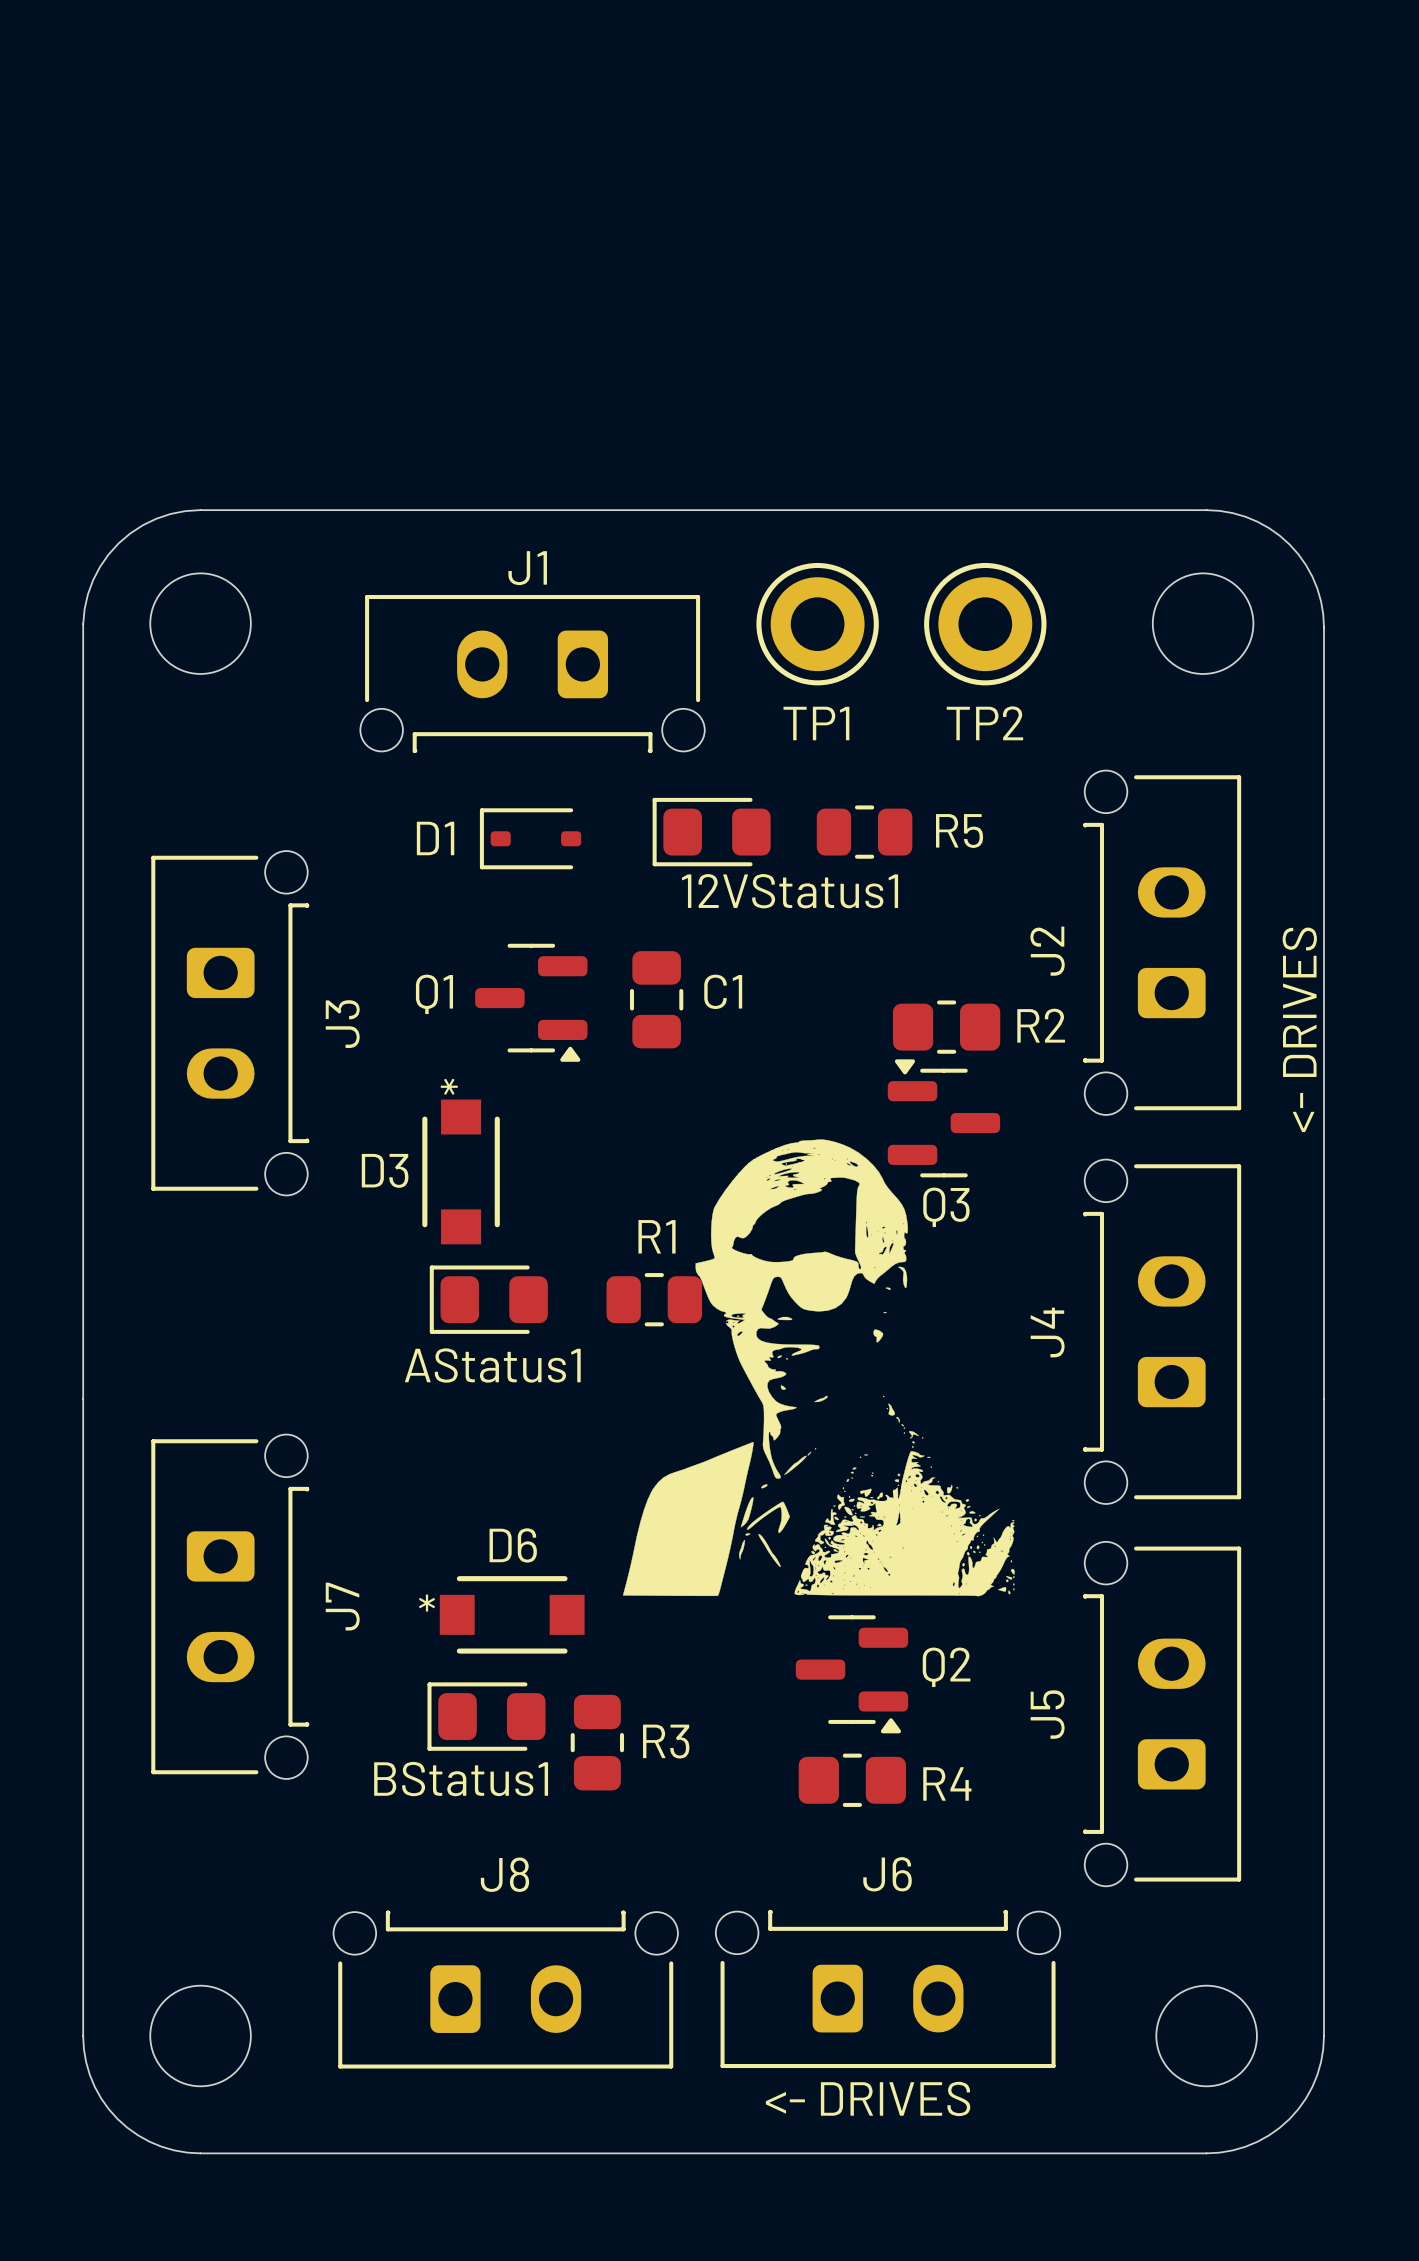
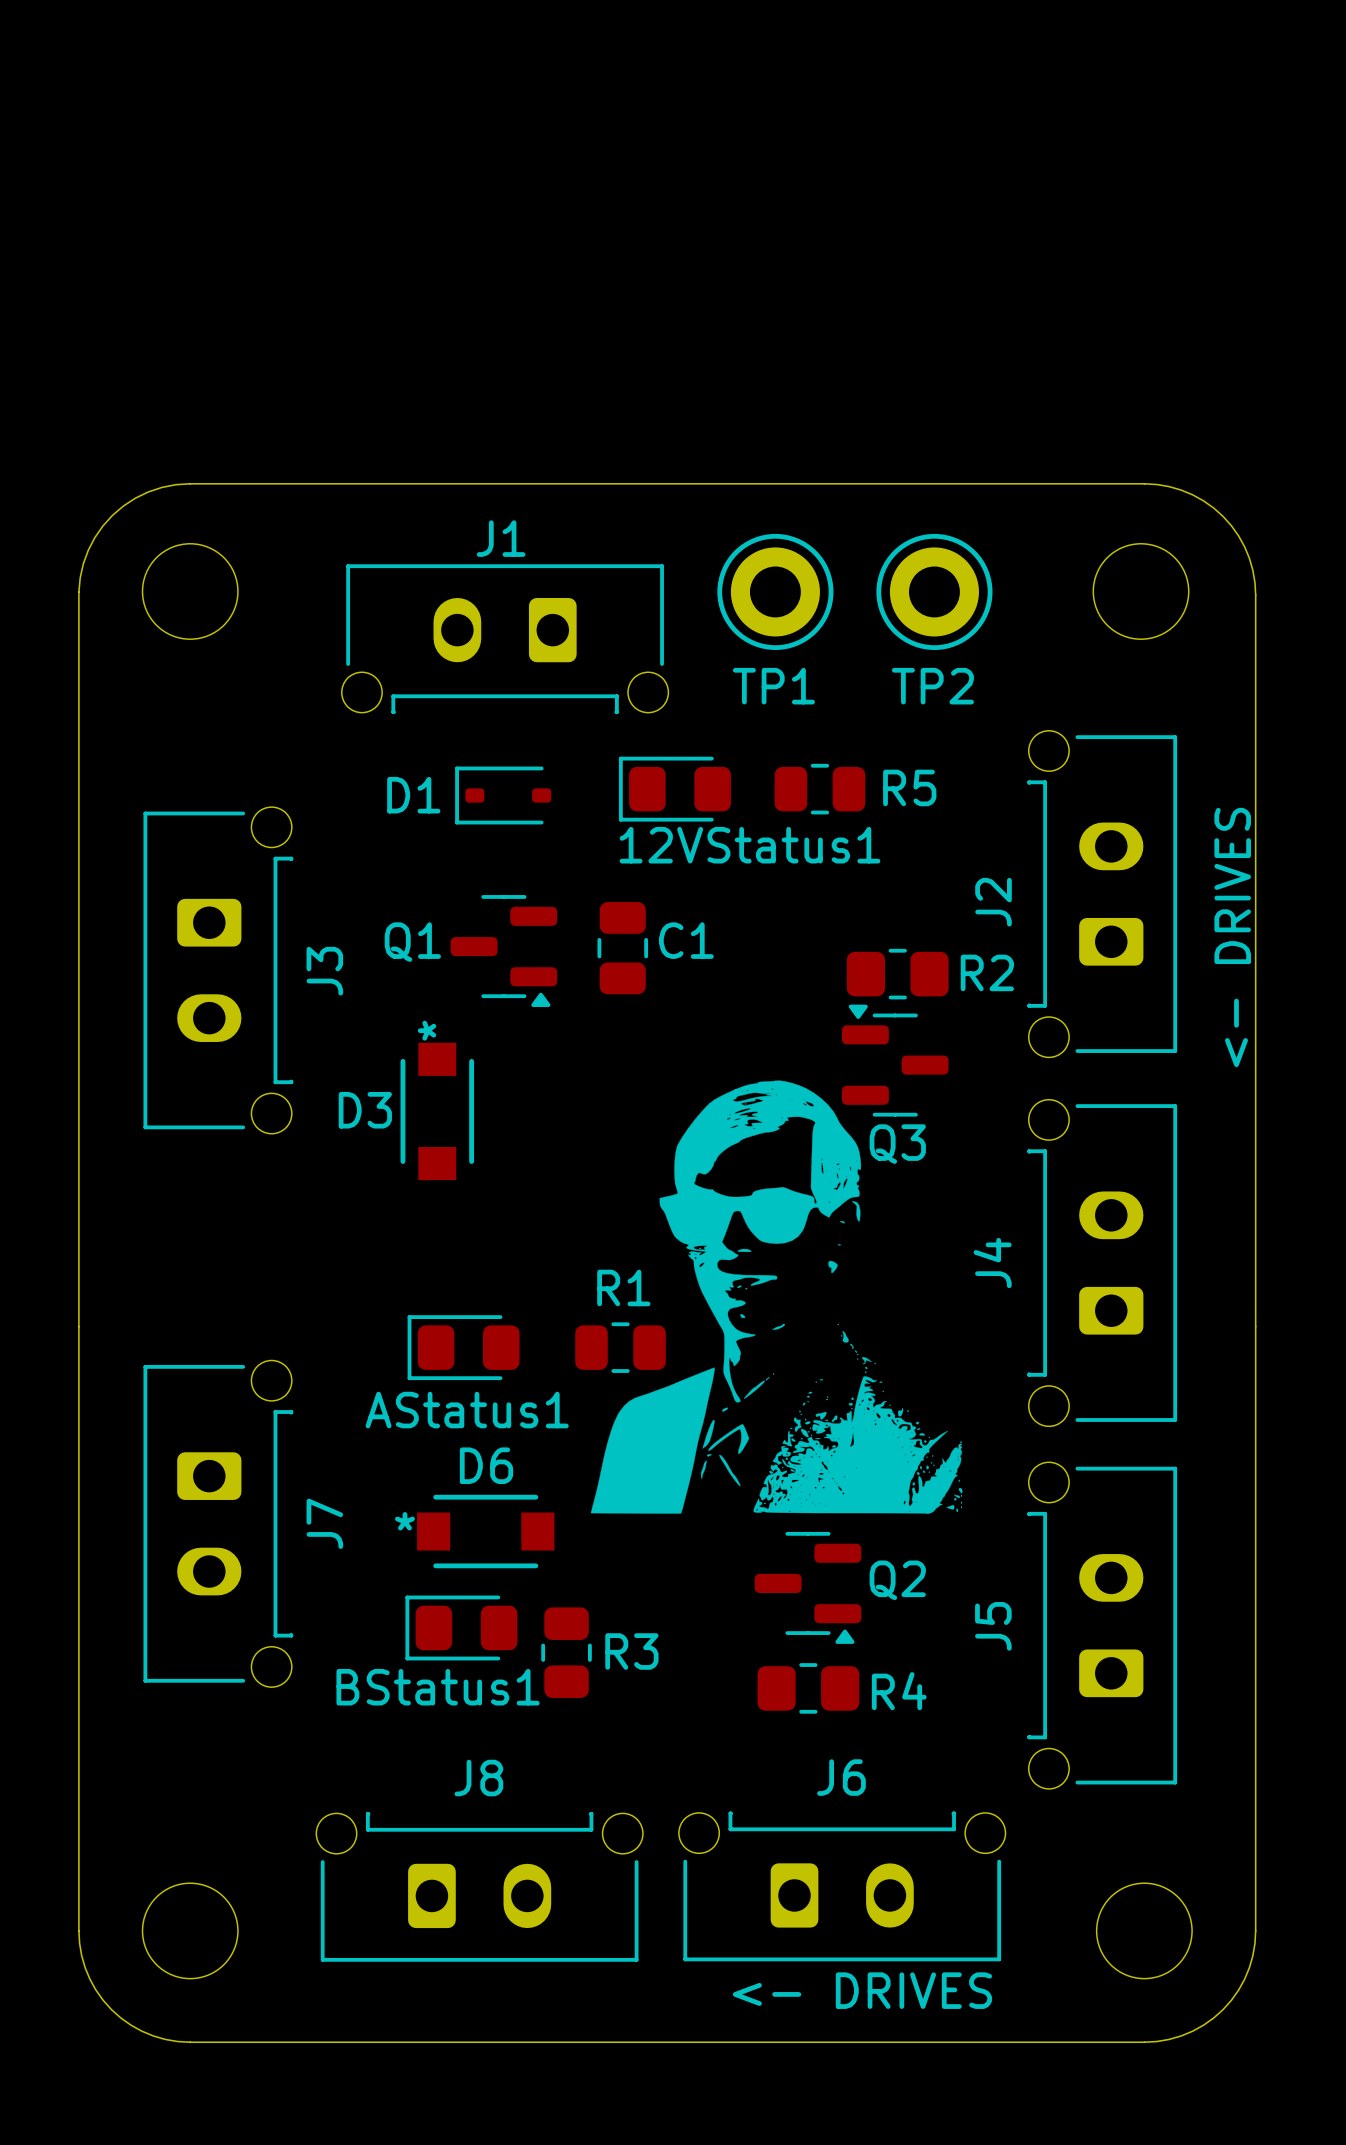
AStatus1 position: (488, 1299) -> (463, 1347)
R1 position: (654, 1299) -> (620, 1347)

